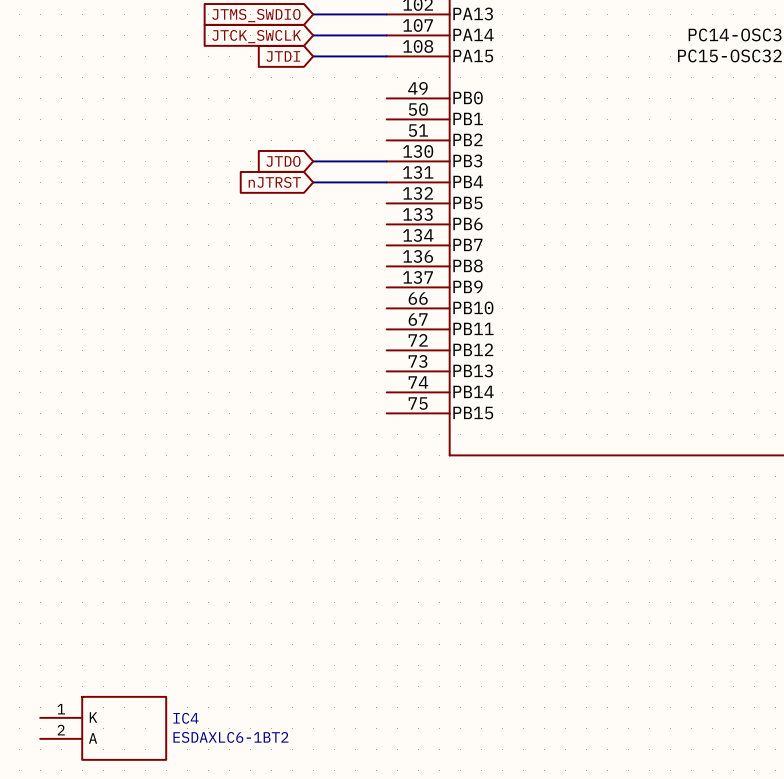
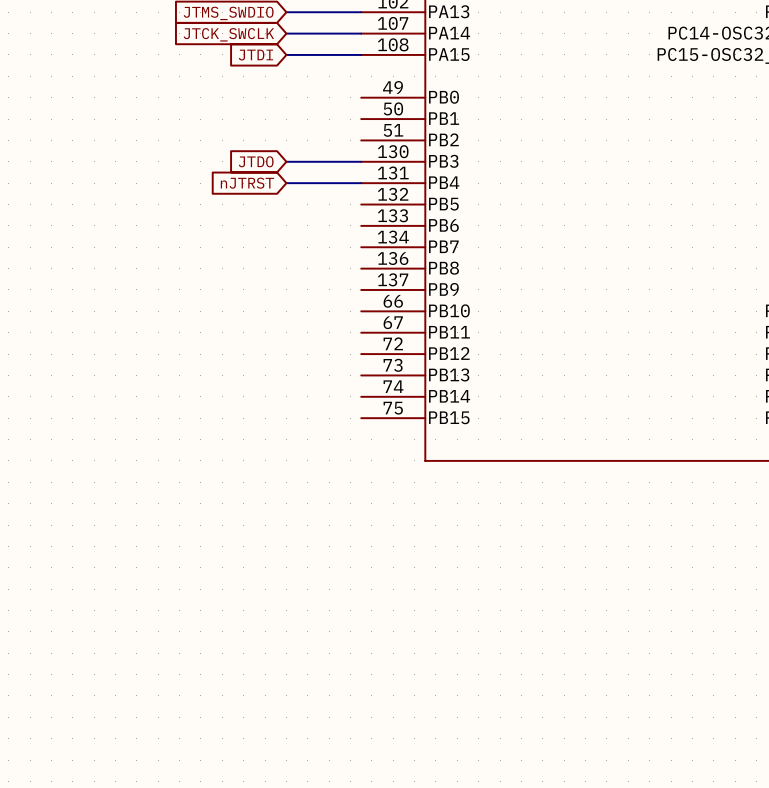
IC4: ESDAXLC6-1BT2 (103, 728) -> none

